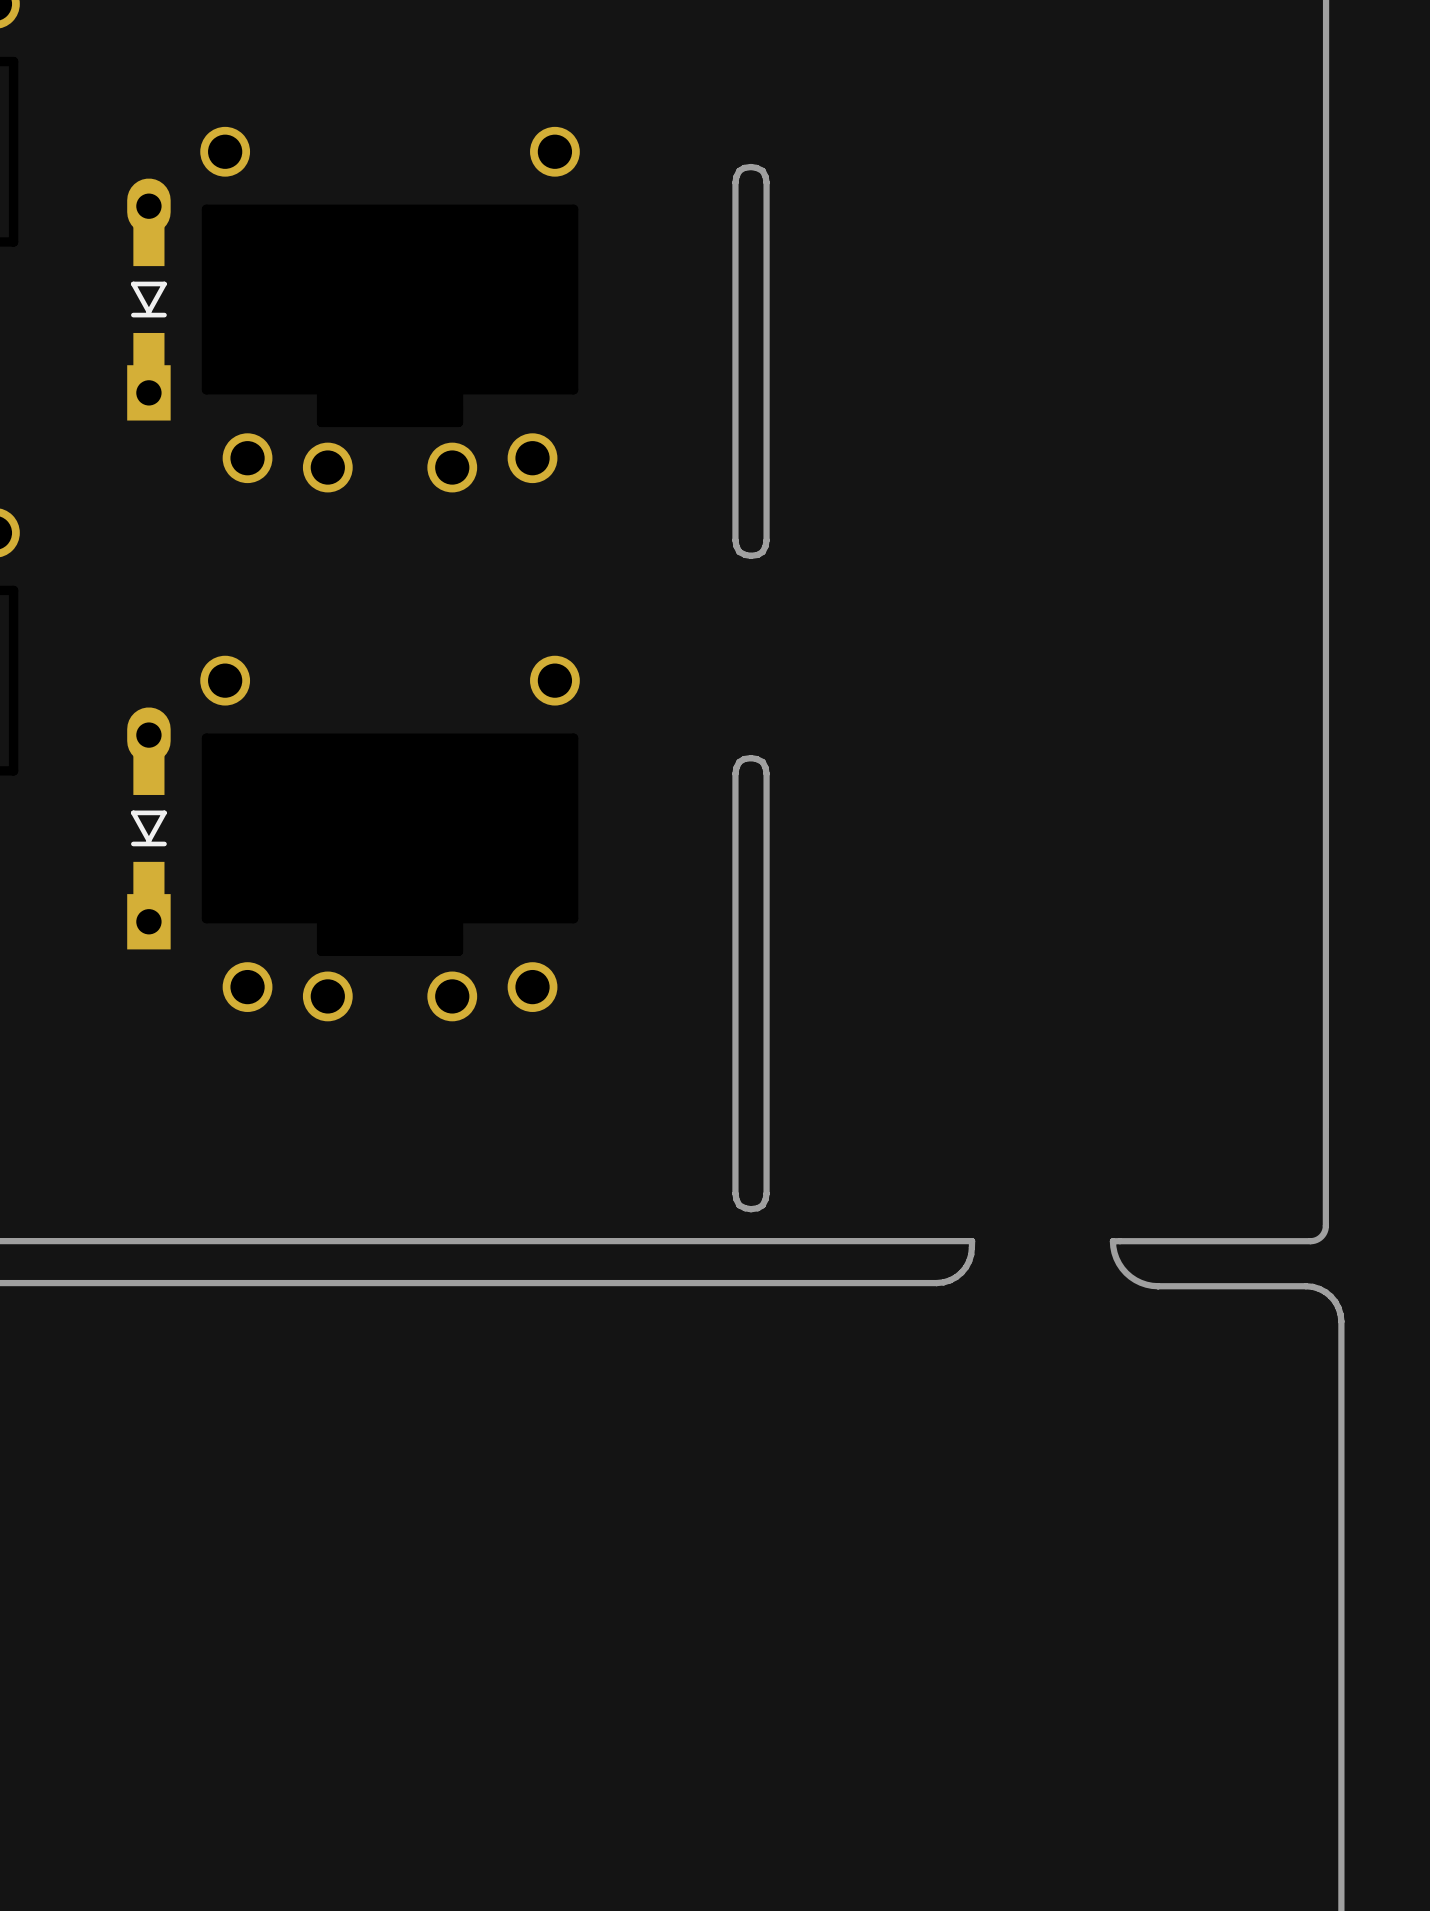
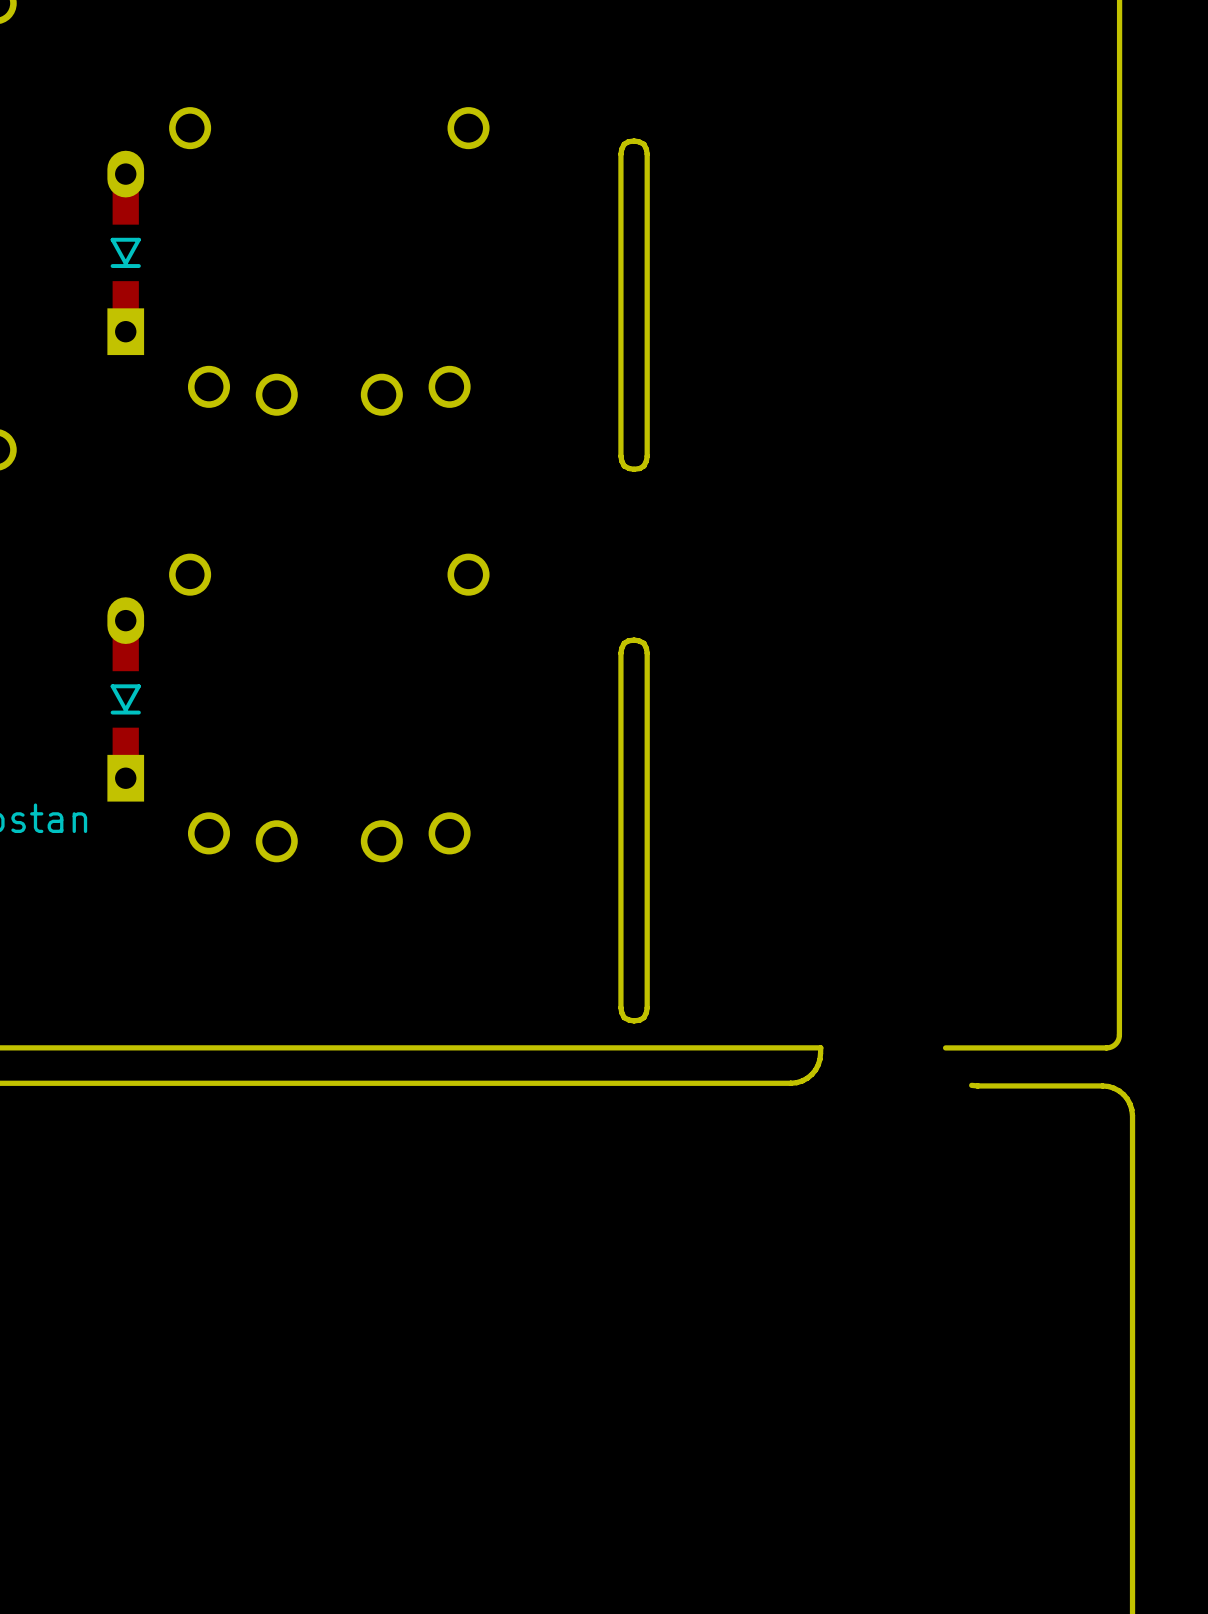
board edge: (1119, 1241) (1112, 1241) (1113, 1247) (1116, 1258) (1122, 1268) (1130, 1276) (1140, 1282) (1158, 1286) -> (971, 1085) (977, 1085)

